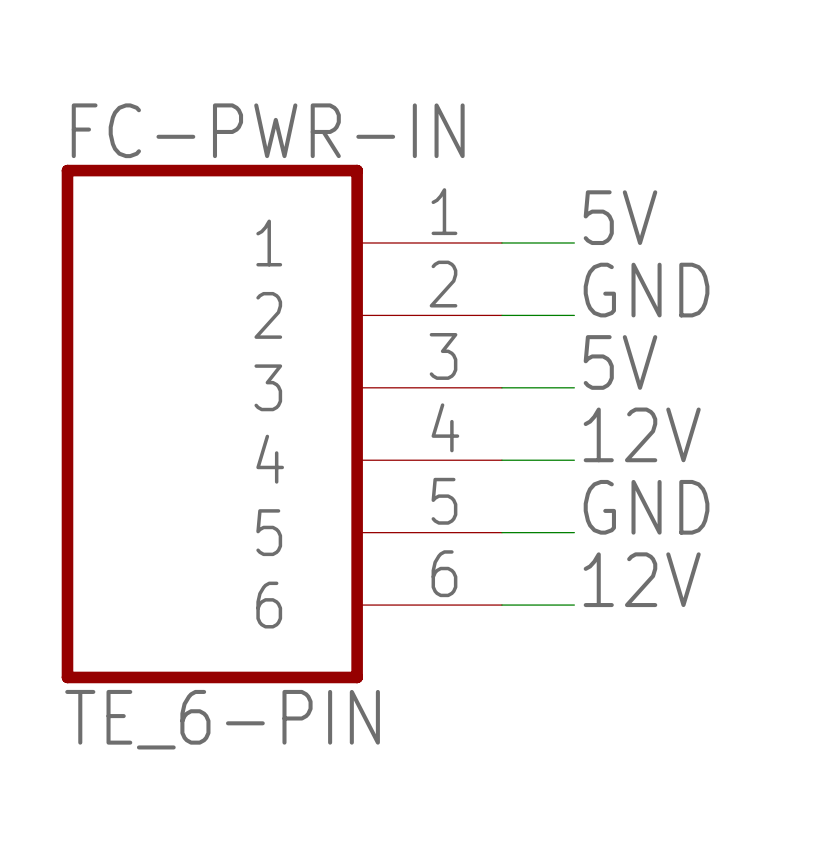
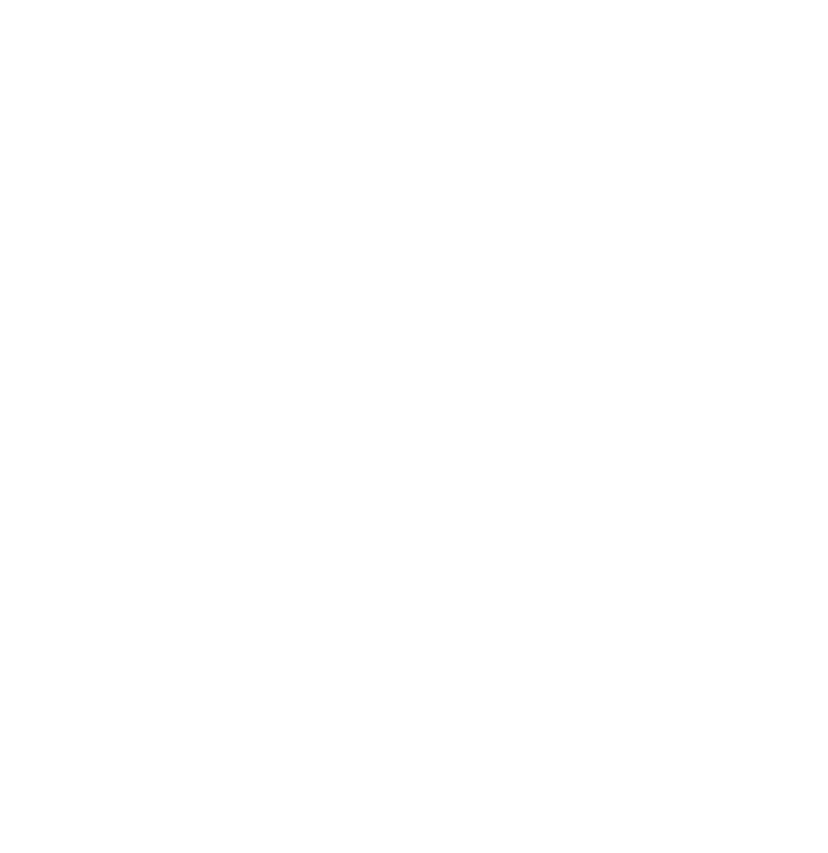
label: 5V (620, 217) -> none
wire: (501, 242) (574, 242) -> none
label: GND (646, 290) -> none
wire: (501, 315) (574, 315) -> none
label: 5V (620, 362) -> none
wire: (501, 387) (574, 387) -> none
FC-PWR-IN: TE_6-PIN (281, 424) -> none
label: 12V (642, 434) -> none
wire: (501, 460) (574, 460) -> none
label: GND (646, 507) -> none
wire: (501, 532) (574, 532) -> none
label: 12V (642, 579) -> none
wire: (501, 605) (574, 605) -> none

